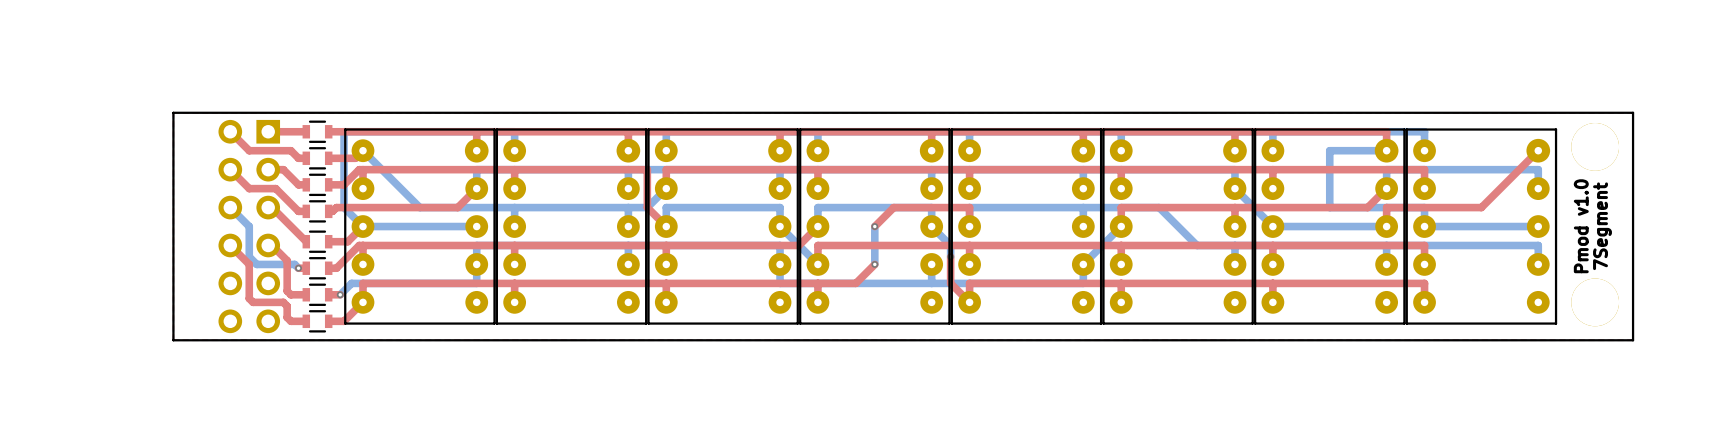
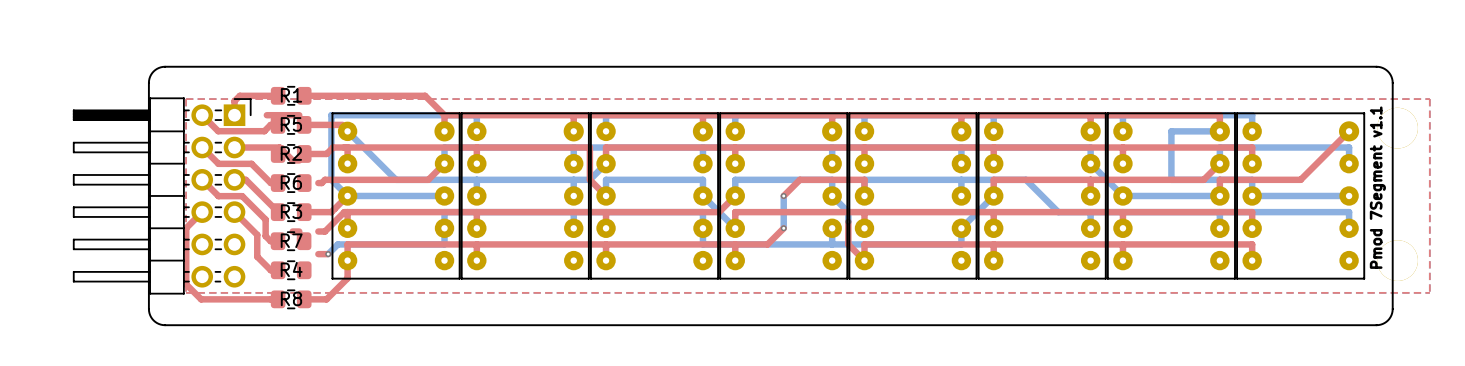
R1: none -> (291, 95)
board edge: (173, 112) (1633, 112) (1633, 340) (173, 340) (173, 112) -> (165, 66) (153, 71) (148, 82) (148, 309) (152, 318) (160, 324) (1376, 325) (1386, 321) (1392, 313) (1392, 82) (1389, 73) (1380, 67) (165, 66)
top track: none -> (202, 115) (218, 131) (264, 131) (270, 124) (278, 124)
top track: (230, 131) (249, 150) (290, 150) (298, 158) (306, 158) -> (234, 115) (234, 101) (239, 95) (278, 95)
part: (317, 131) -> none
top track: (328, 131) (476, 131) -> (304, 95) (425, 95) (444, 115)
R5: none -> (291, 124)
top track: (362, 150) (355, 158) (328, 158) -> (347, 131) (342, 124) (304, 124)
part: (317, 158) -> none
top track: none -> (202, 147) (218, 163) (251, 163) (270, 183) (278, 183)
top track: (230, 169) (249, 188) (275, 188) (298, 211) (306, 211) -> (234, 147) (266, 147)
top track: (359, 169) (344, 184) (328, 184) -> (344, 147) (333, 147) (326, 153) (304, 153)
R2: none -> (291, 153)
part: (317, 184) -> none
top track: none -> (202, 179) (218, 196) (242, 196) (265, 219) (265, 236) (270, 241) (278, 241) (274, 241)
top track: none -> (234, 179) (245, 179) (278, 212)
bottom track: (230, 207) (249, 226) (249, 256) (256, 264) (294, 264) (298, 268) -> none
top track: (268, 207) (272, 207) (306, 241) -> none
R6: none -> (291, 183)
part: (317, 211) -> none
part: none -> (162, 195)
part: (249, 226) -> none
text: Pmod v1.0 (1581, 226) -> Pmod 7Segment v1.1 (1377, 187)
text: 7Segment (1602, 226) -> none
part: (317, 241) -> none
top track: (328, 241) (347, 241) -> (304, 212) (331, 212) (334, 208)
top track: none -> (202, 212) (186, 228) (186, 284) (201, 299) (278, 299)
top track: (268, 245) (272, 245) (287, 260) (287, 290) (290, 294) (306, 294) -> none
R3: none -> (291, 212)
top track: (249, 264) (249, 298) (253, 302) (283, 302) (287, 306) (287, 317) (290, 321) (306, 321) -> (250, 228) (257, 234) (257, 256) (270, 270) (278, 270)
via: (298, 268) -> none
part: (317, 268) -> none
R7: none -> (291, 241)
part: (317, 294) -> none
top track: (362, 302) (344, 321) (328, 321) -> (347, 260) (347, 278) (326, 299) (304, 299)
R4: none -> (291, 270)
part: (317, 321) -> none
R8: none -> (291, 299)

